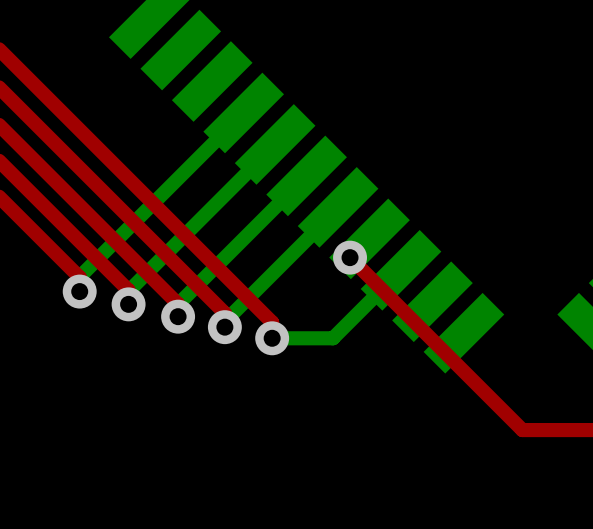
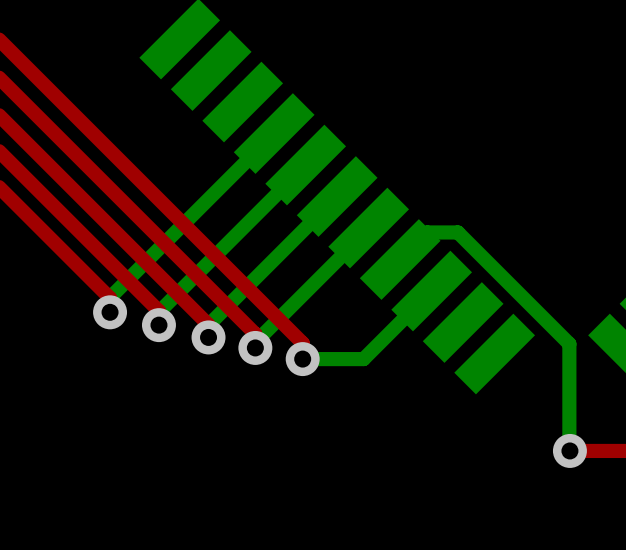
bottom track: none -> (400, 259) (427, 232) (457, 232) (569, 343) (569, 450)
top track: (350, 257) (522, 430) (539, 430) -> none
via: (350, 257) -> none
via: none -> (569, 450)

